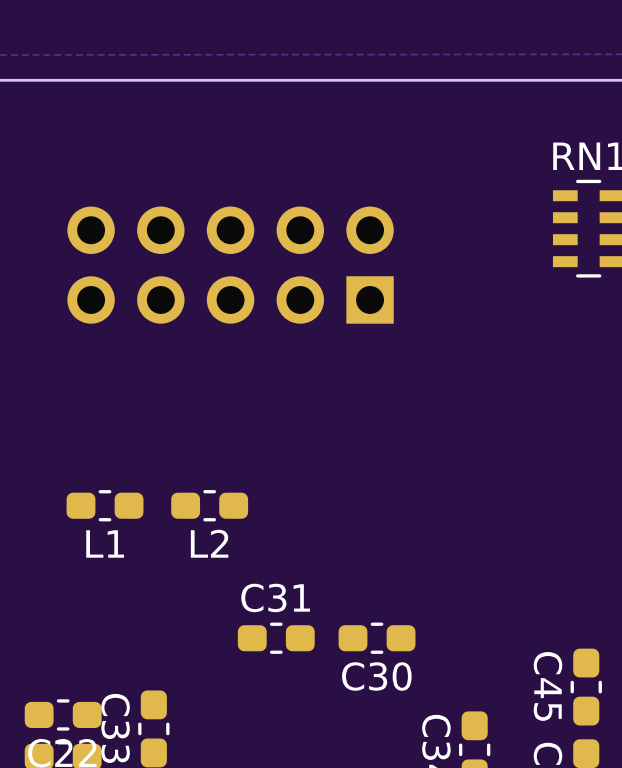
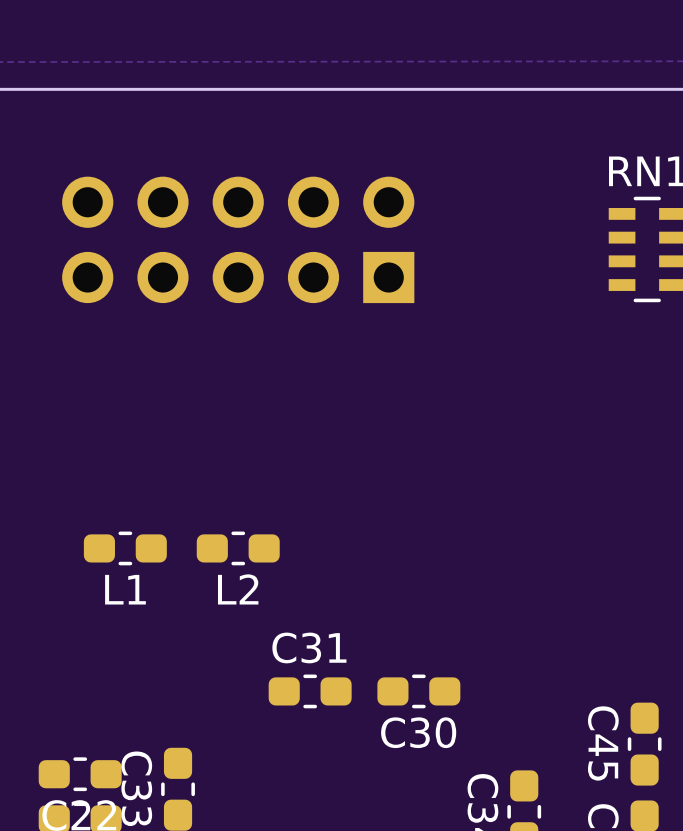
part position: (230, 265) -> (238, 239)

